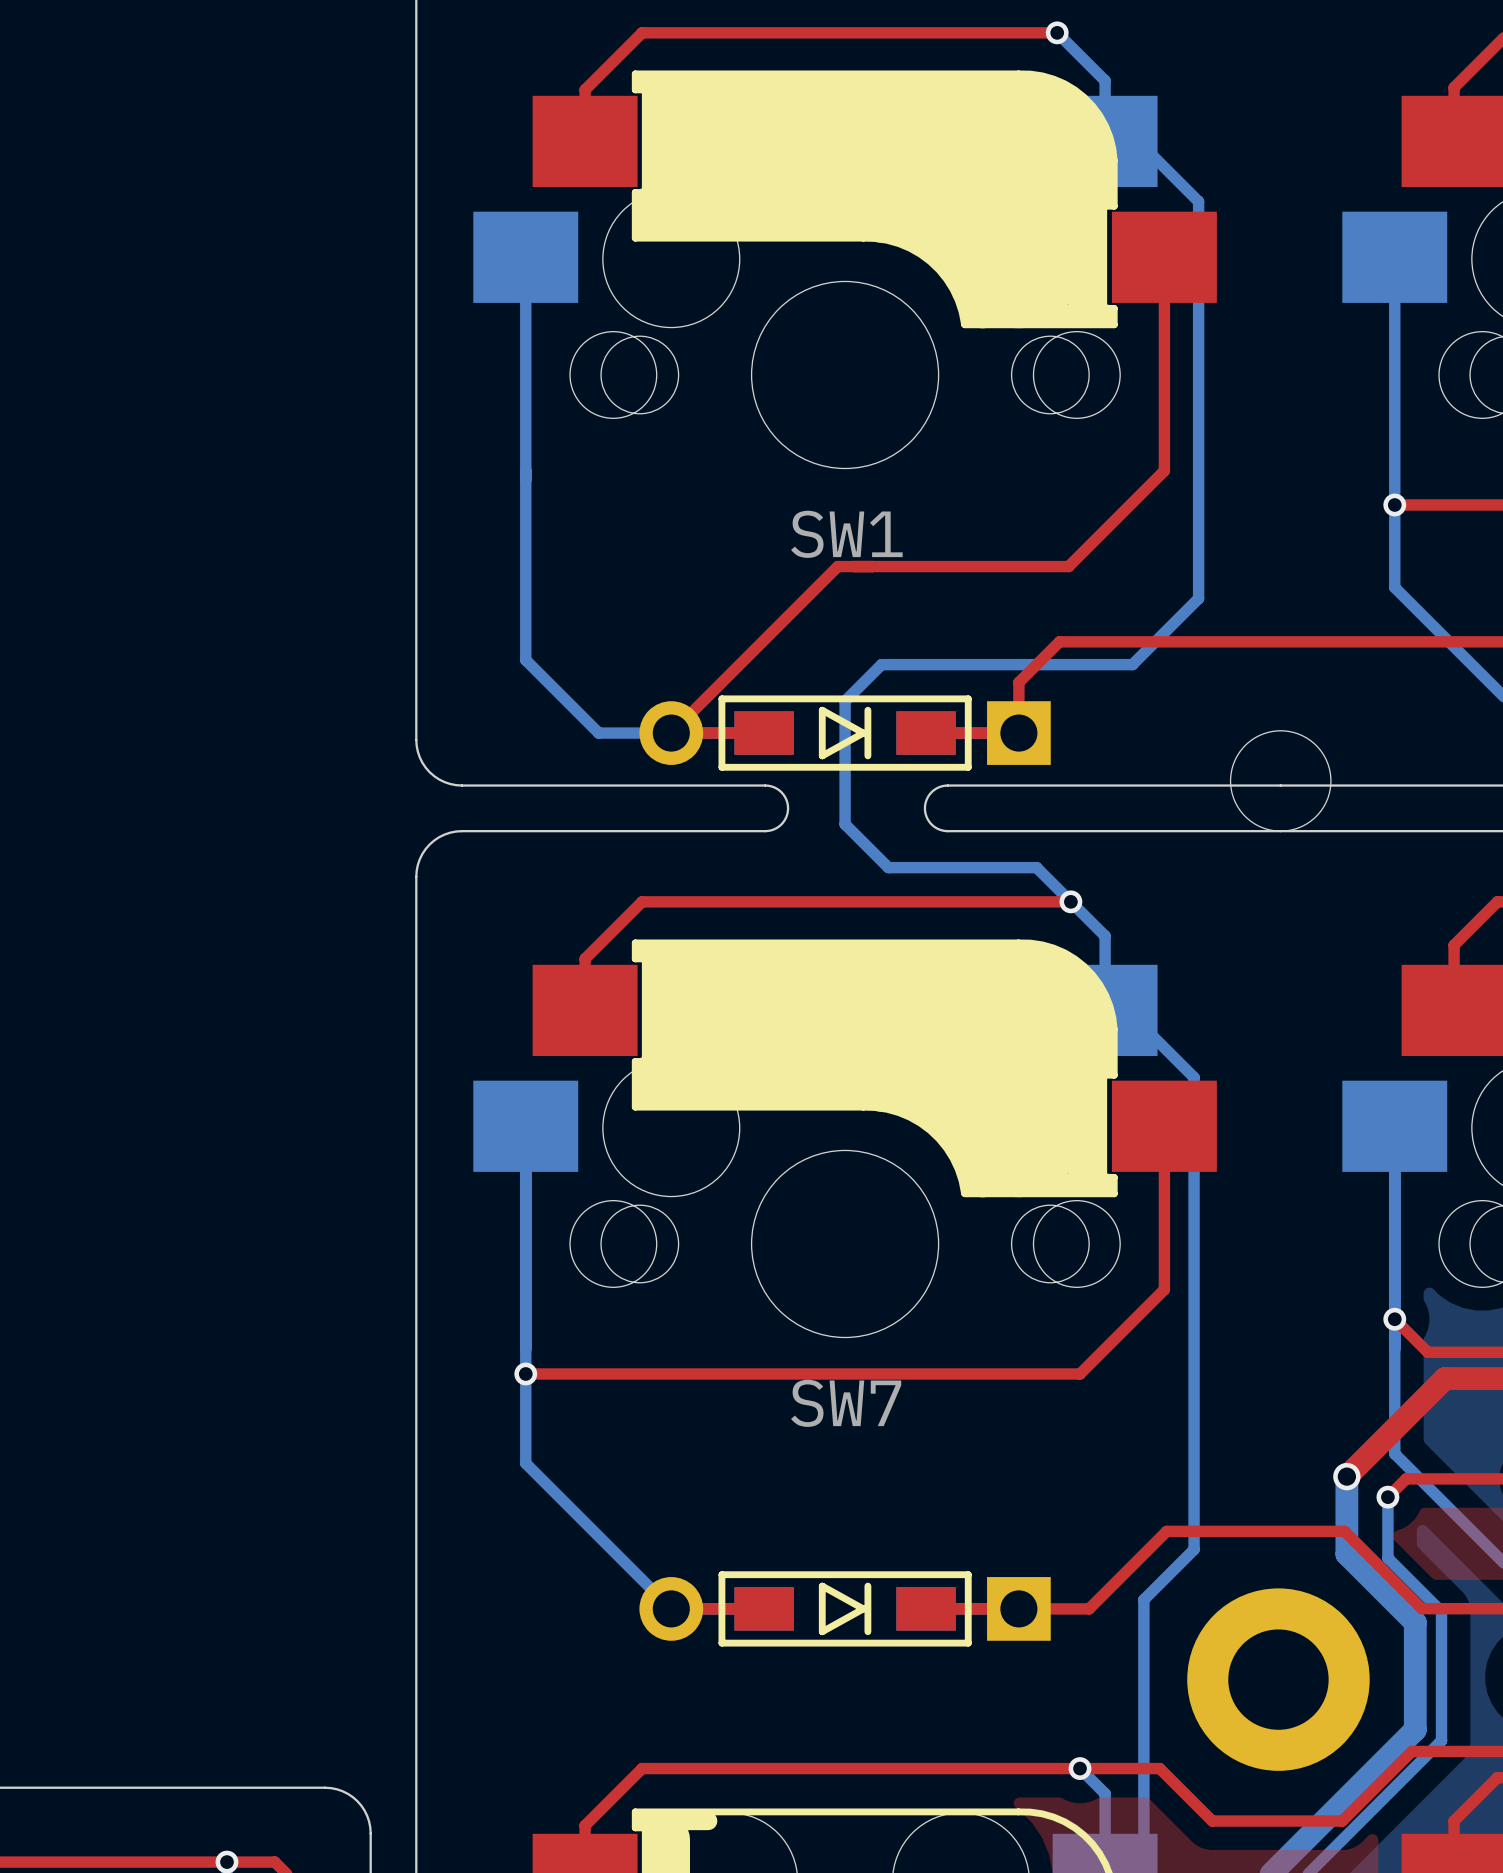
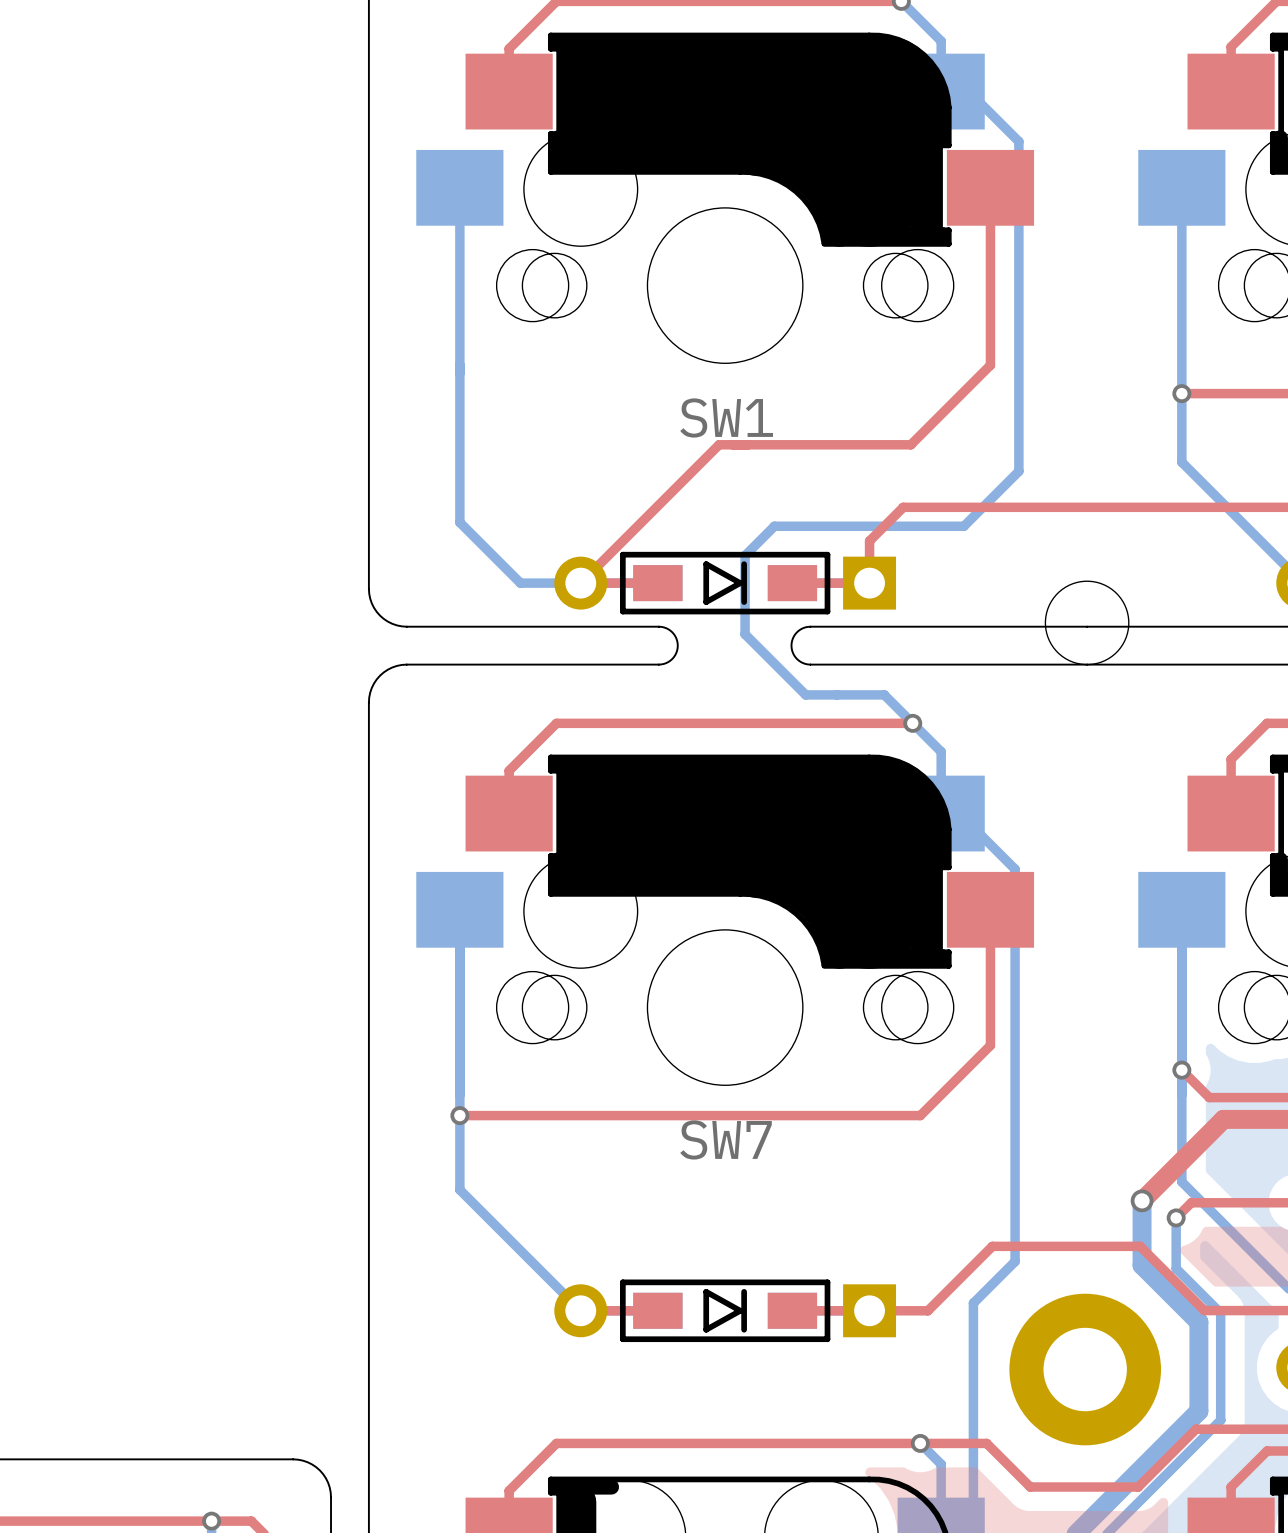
bottom track: (904, 664) (881, 664) (845, 701) (845, 824) (888, 867) (942, 867) -> (774, 526) (745, 555) (745, 634) (805, 694)

